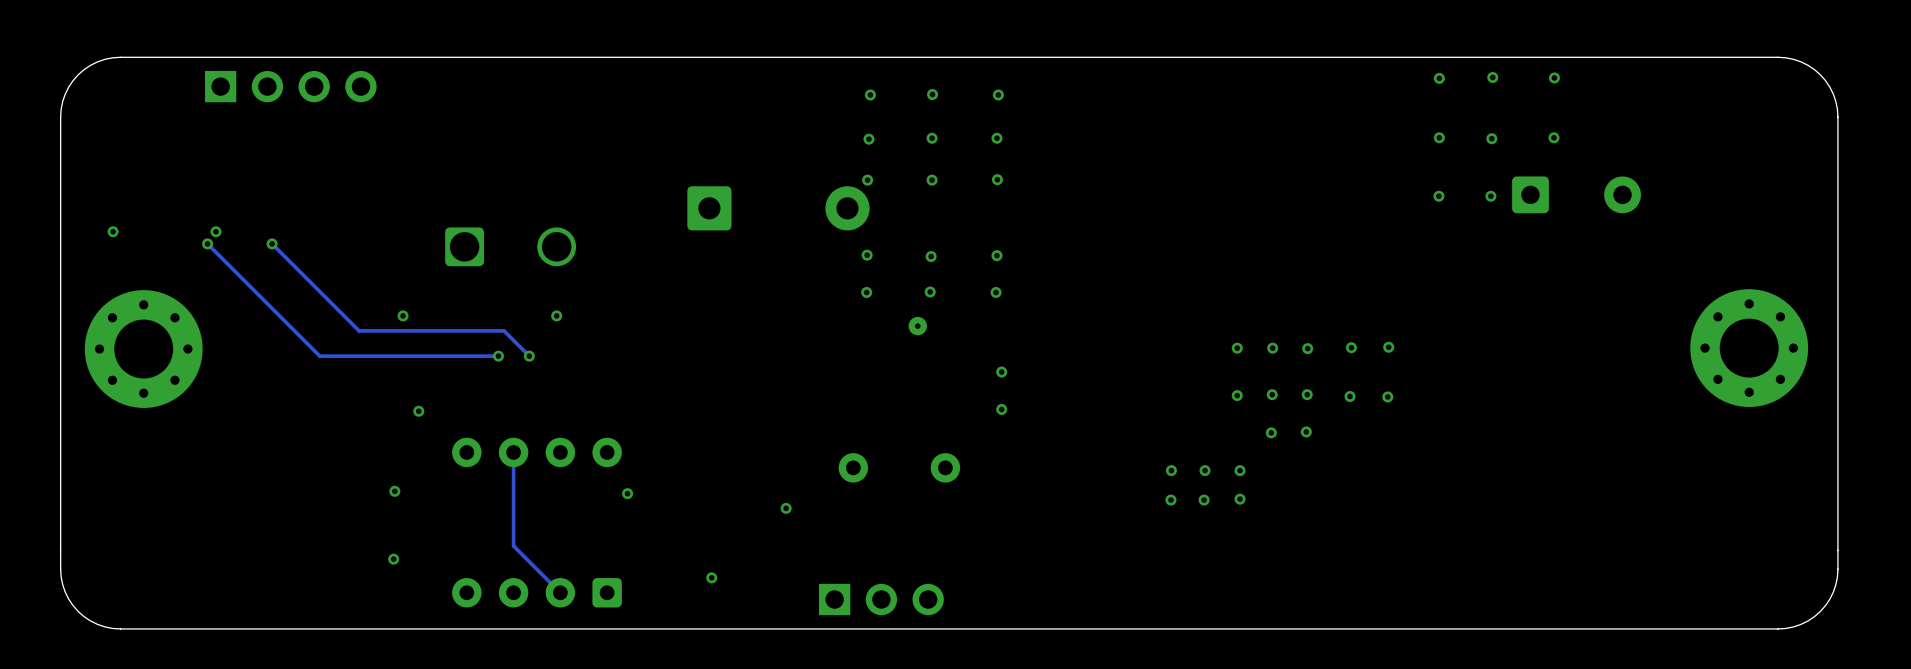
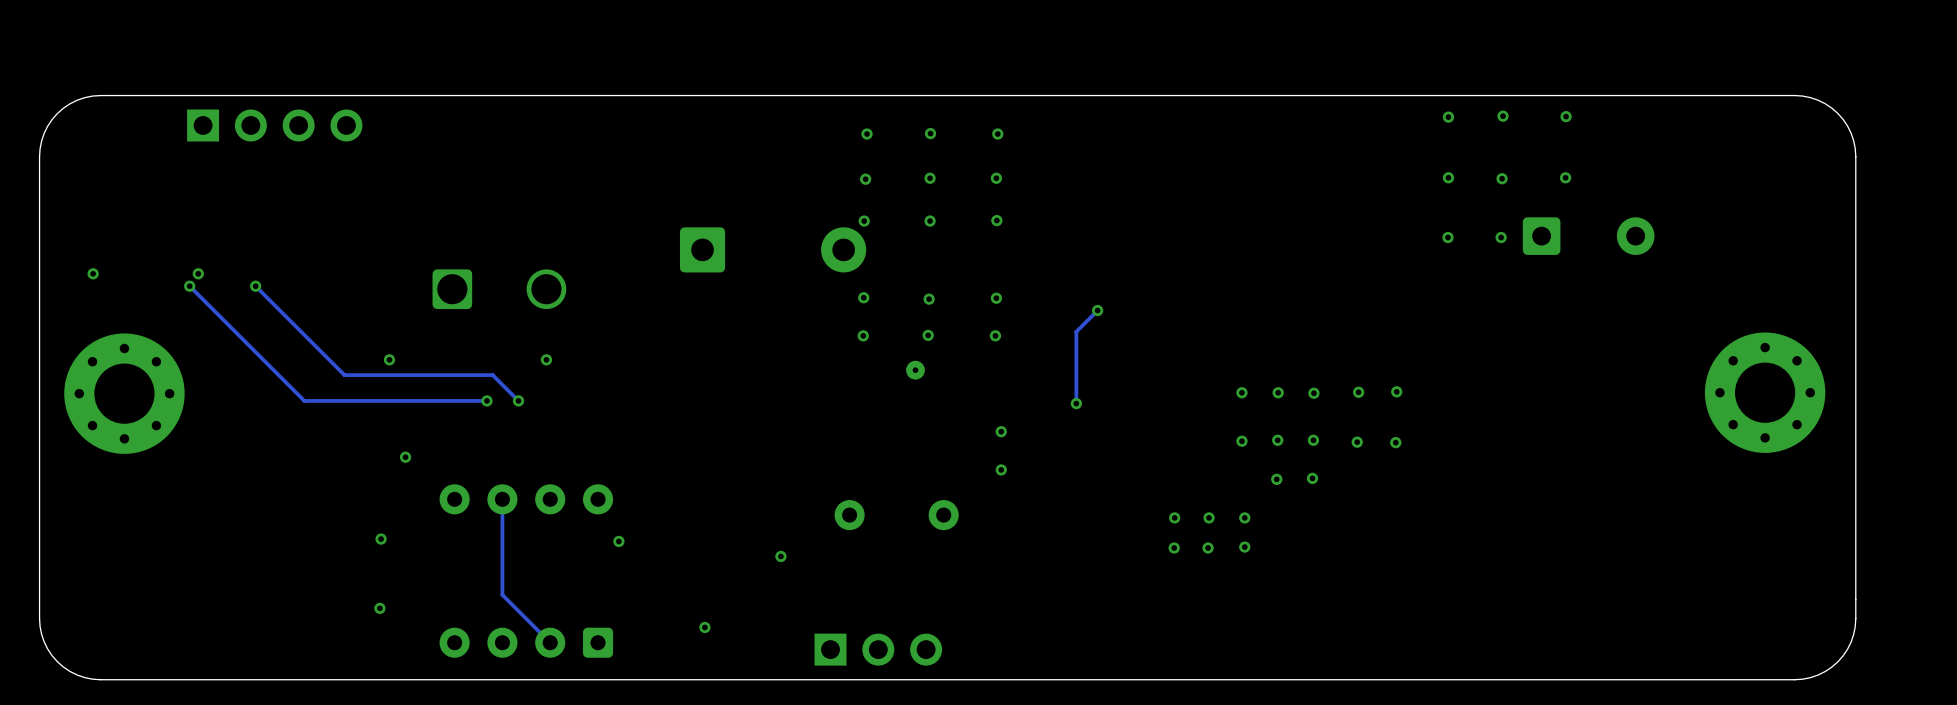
track: none -> (1097, 310) (1076, 331) (1076, 403)
via: none -> (1097, 310)
via: none -> (1076, 403)
via: (1001, 372) -> none
via: none -> (1001, 431)
via: (1001, 409) -> none
via: none -> (1001, 469)

